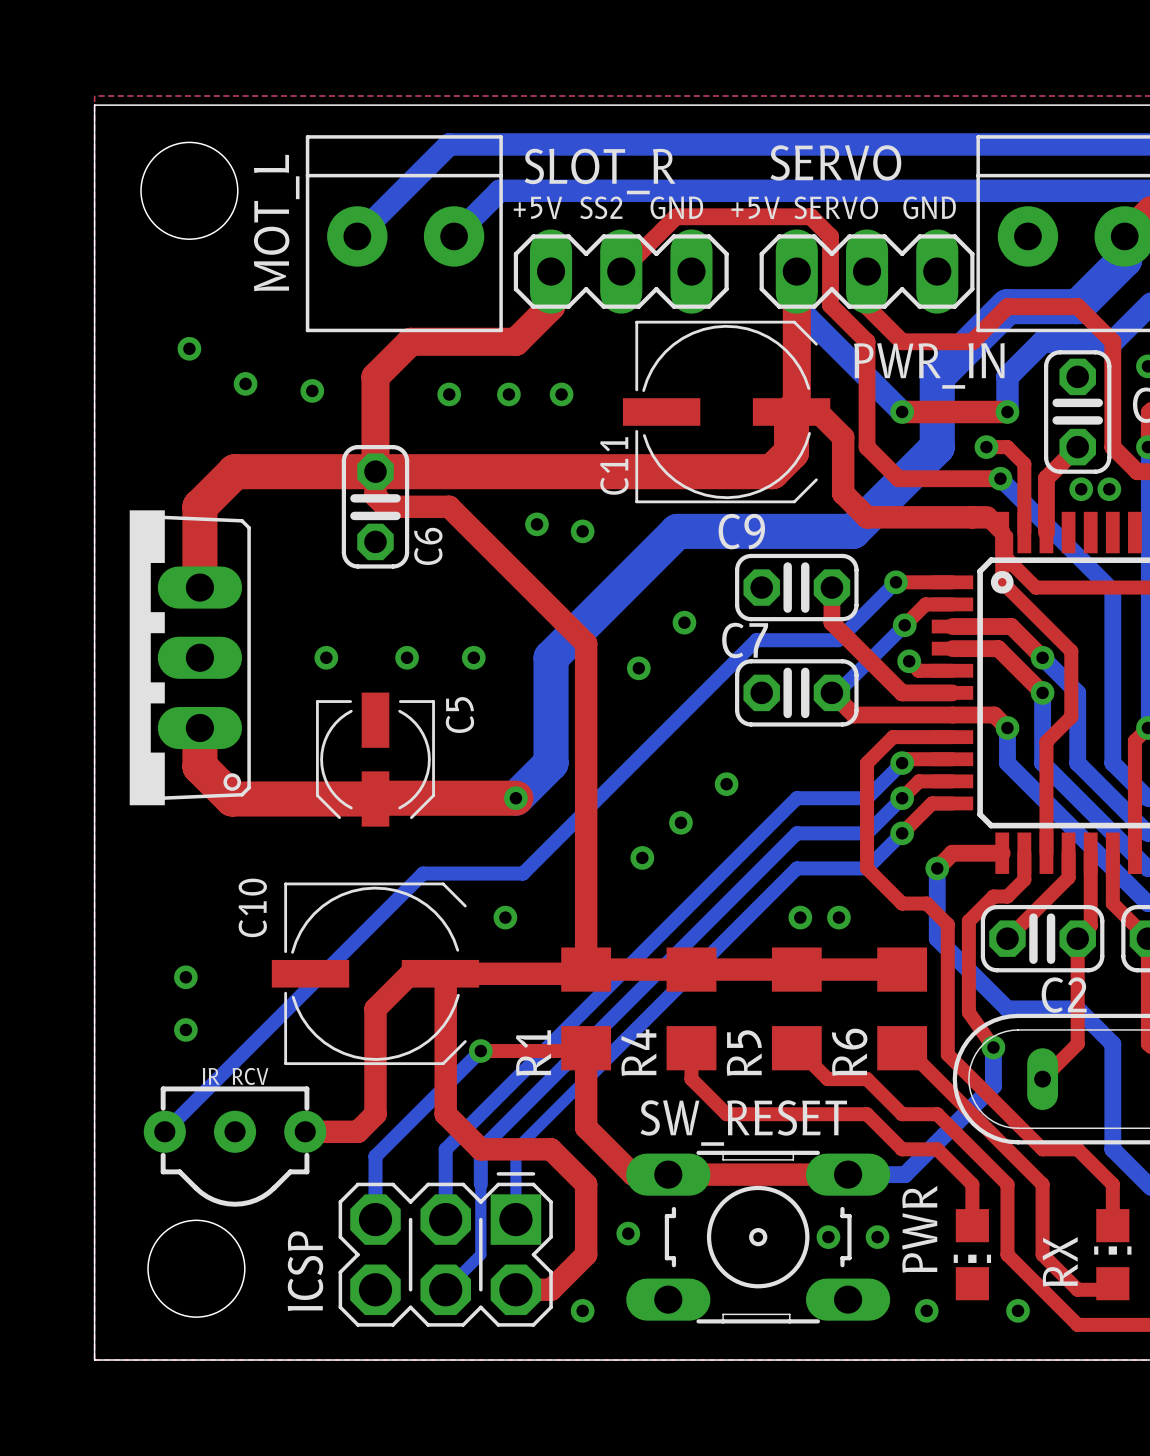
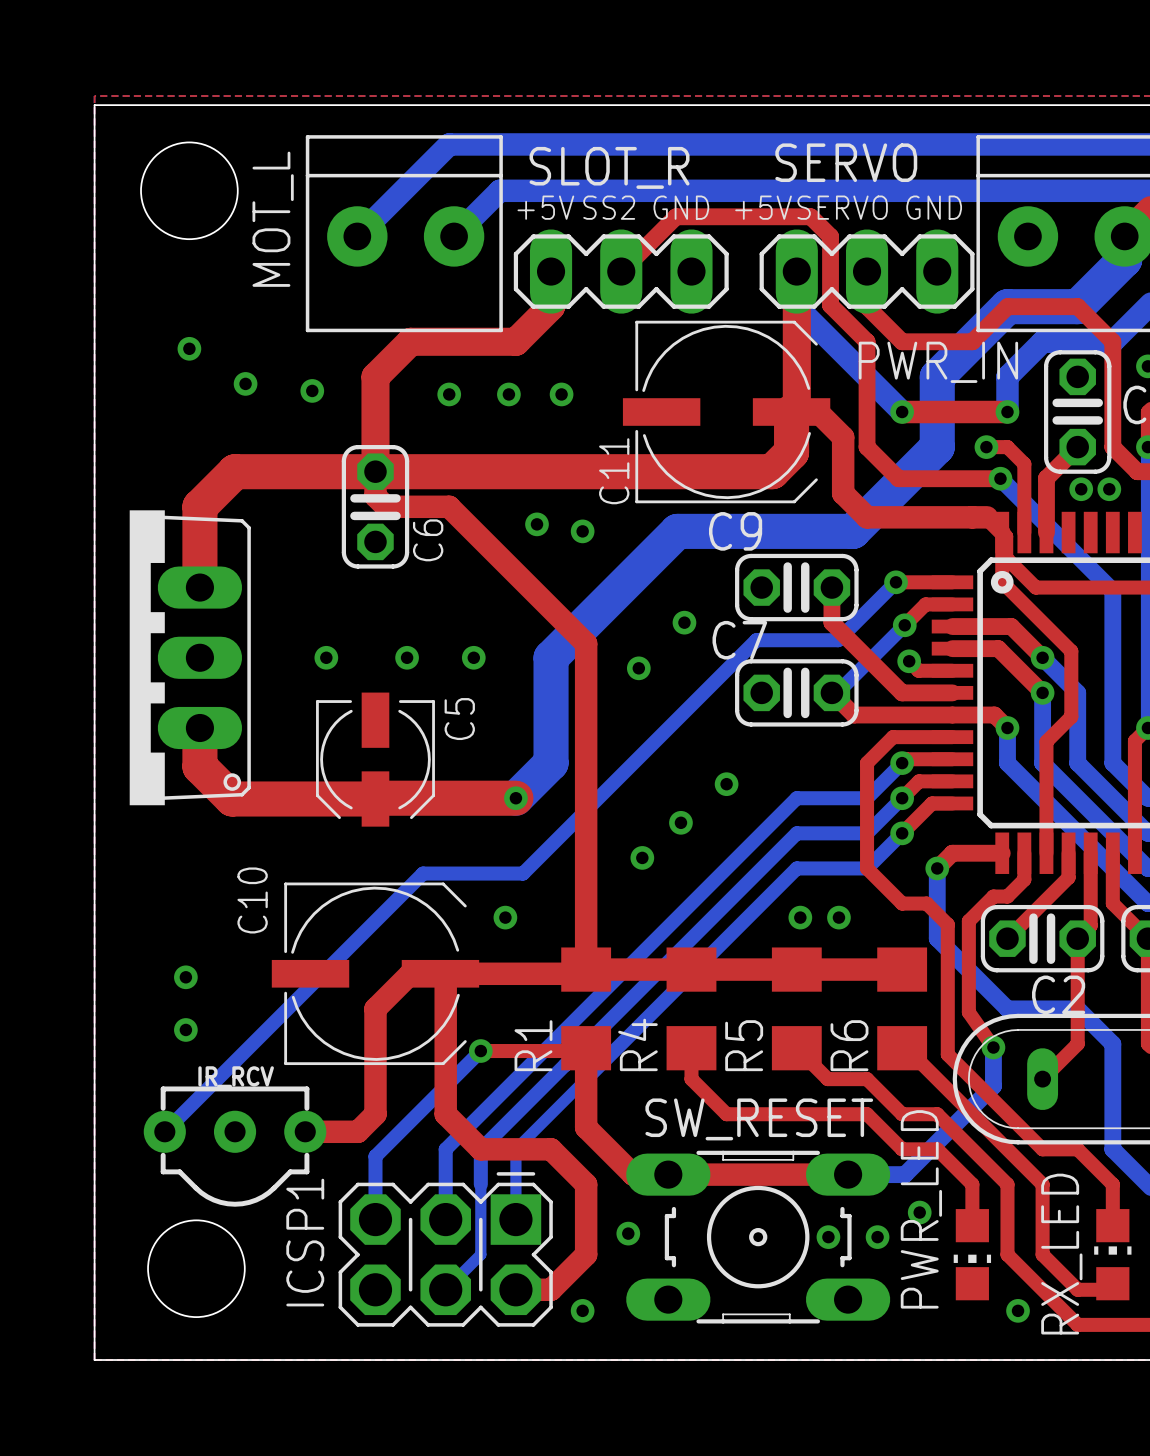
PWR name: PWR (919, 1229) -> PWR_LED (921, 1209)
RX name: RX (1060, 1261) -> RX_LED (1061, 1254)
ICSP name: ICSP (305, 1271) -> ICSP1 (305, 1242)
via position: (926, 1310) -> (919, 1212)

